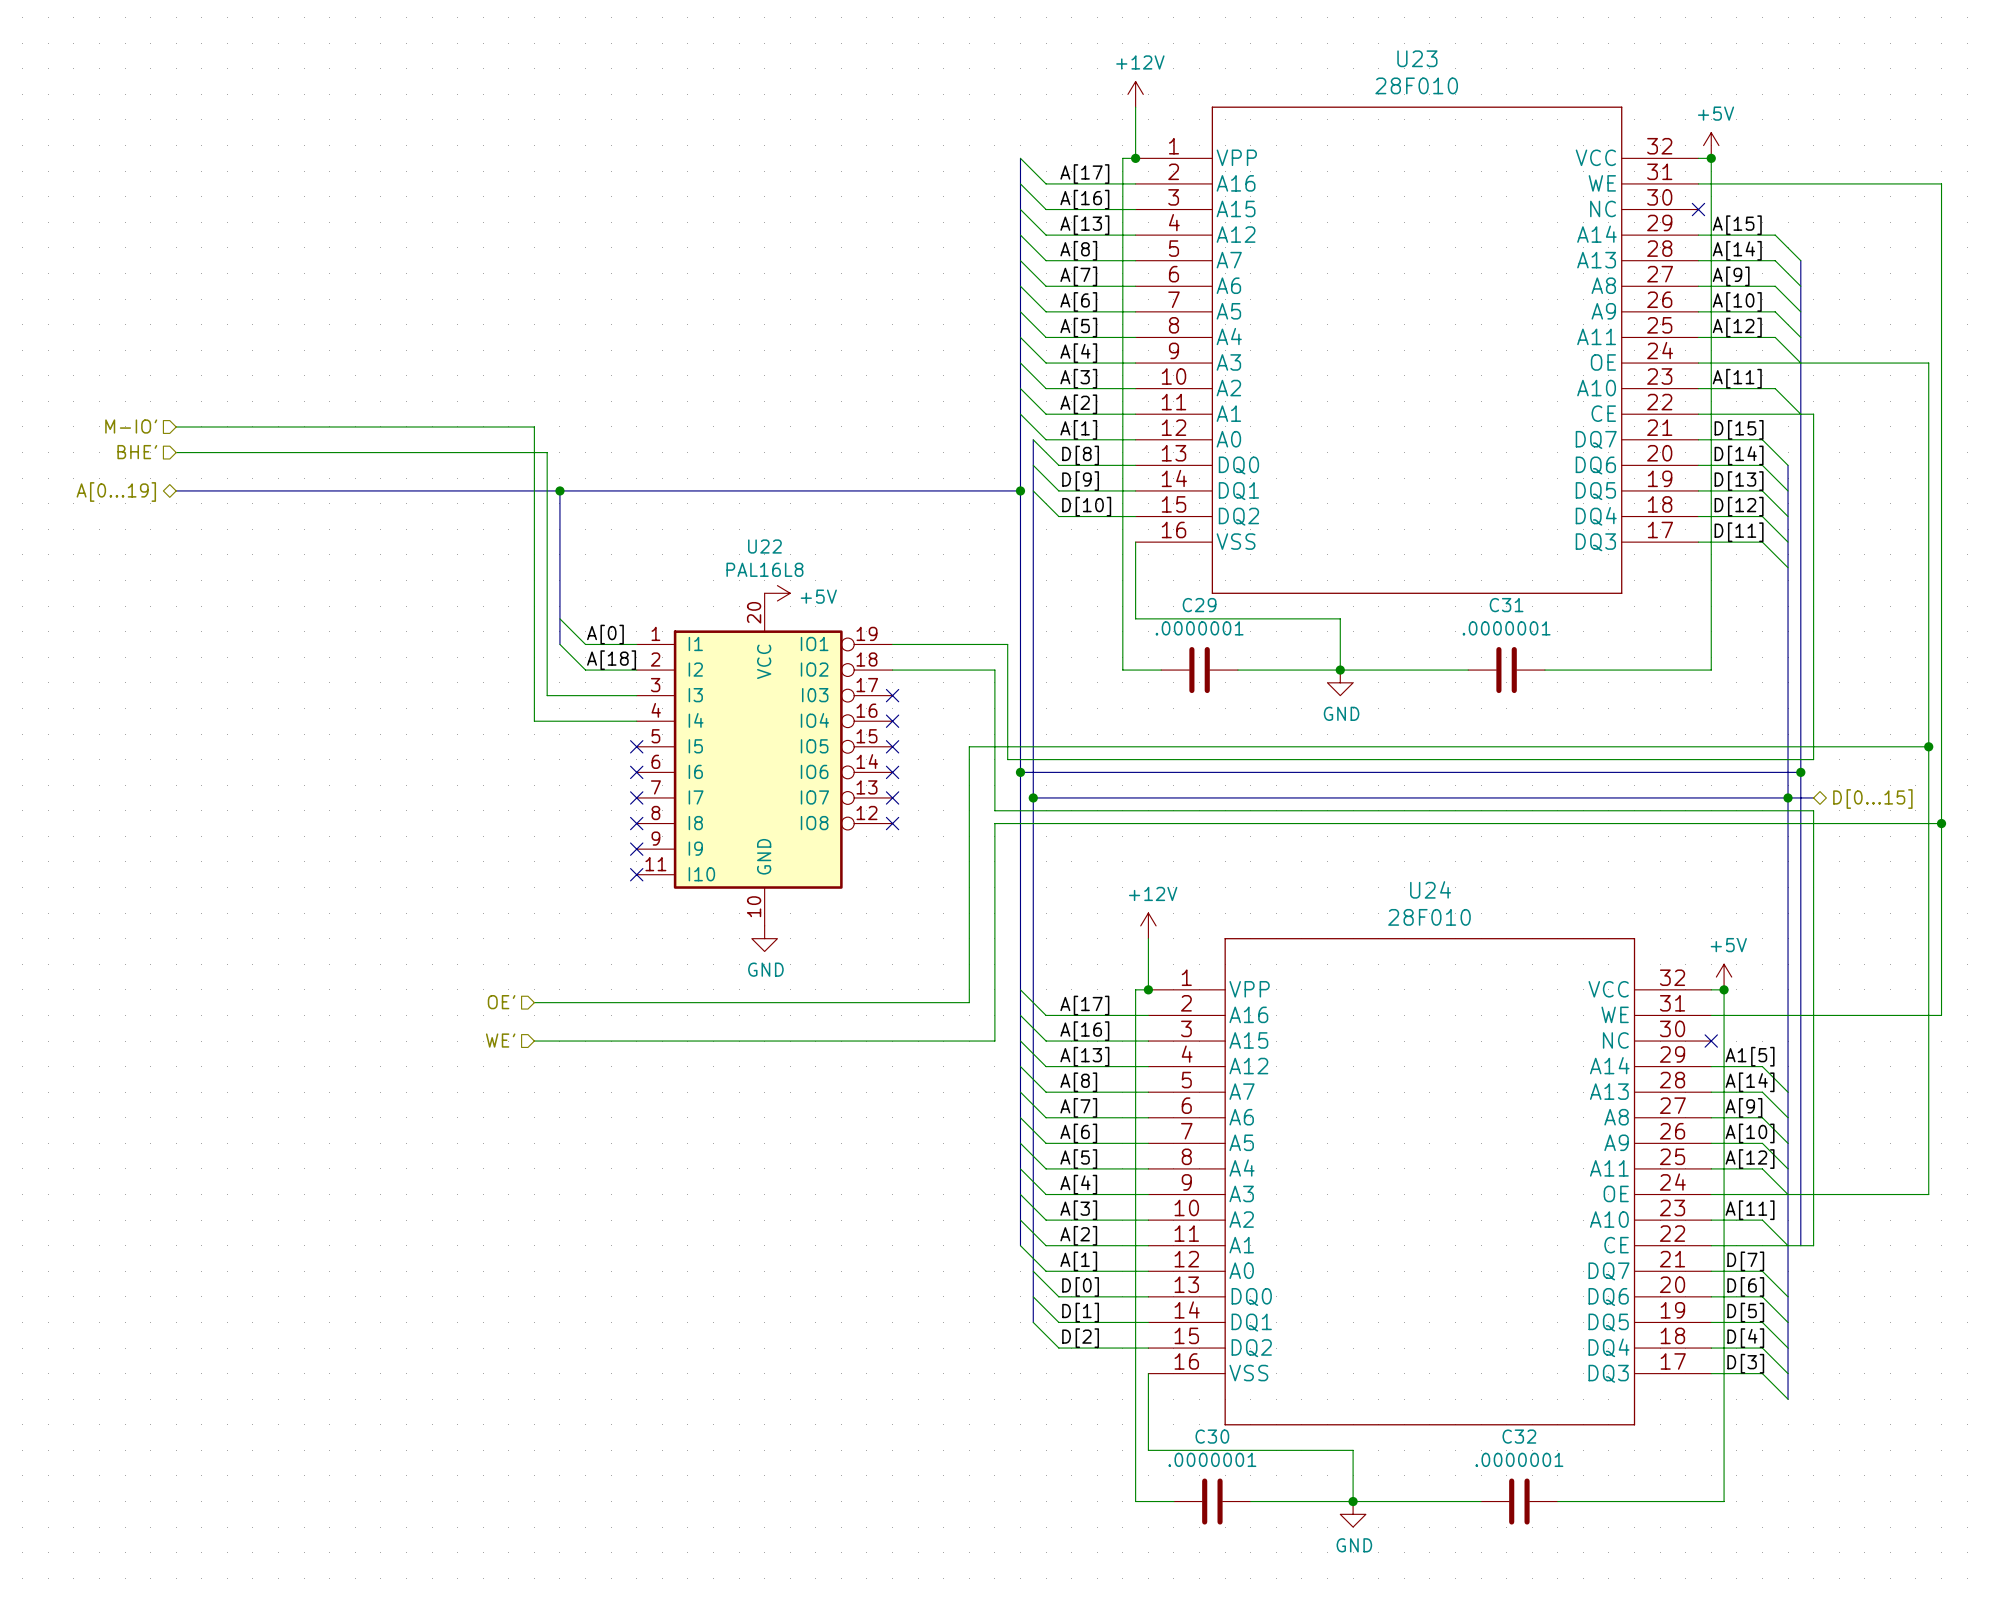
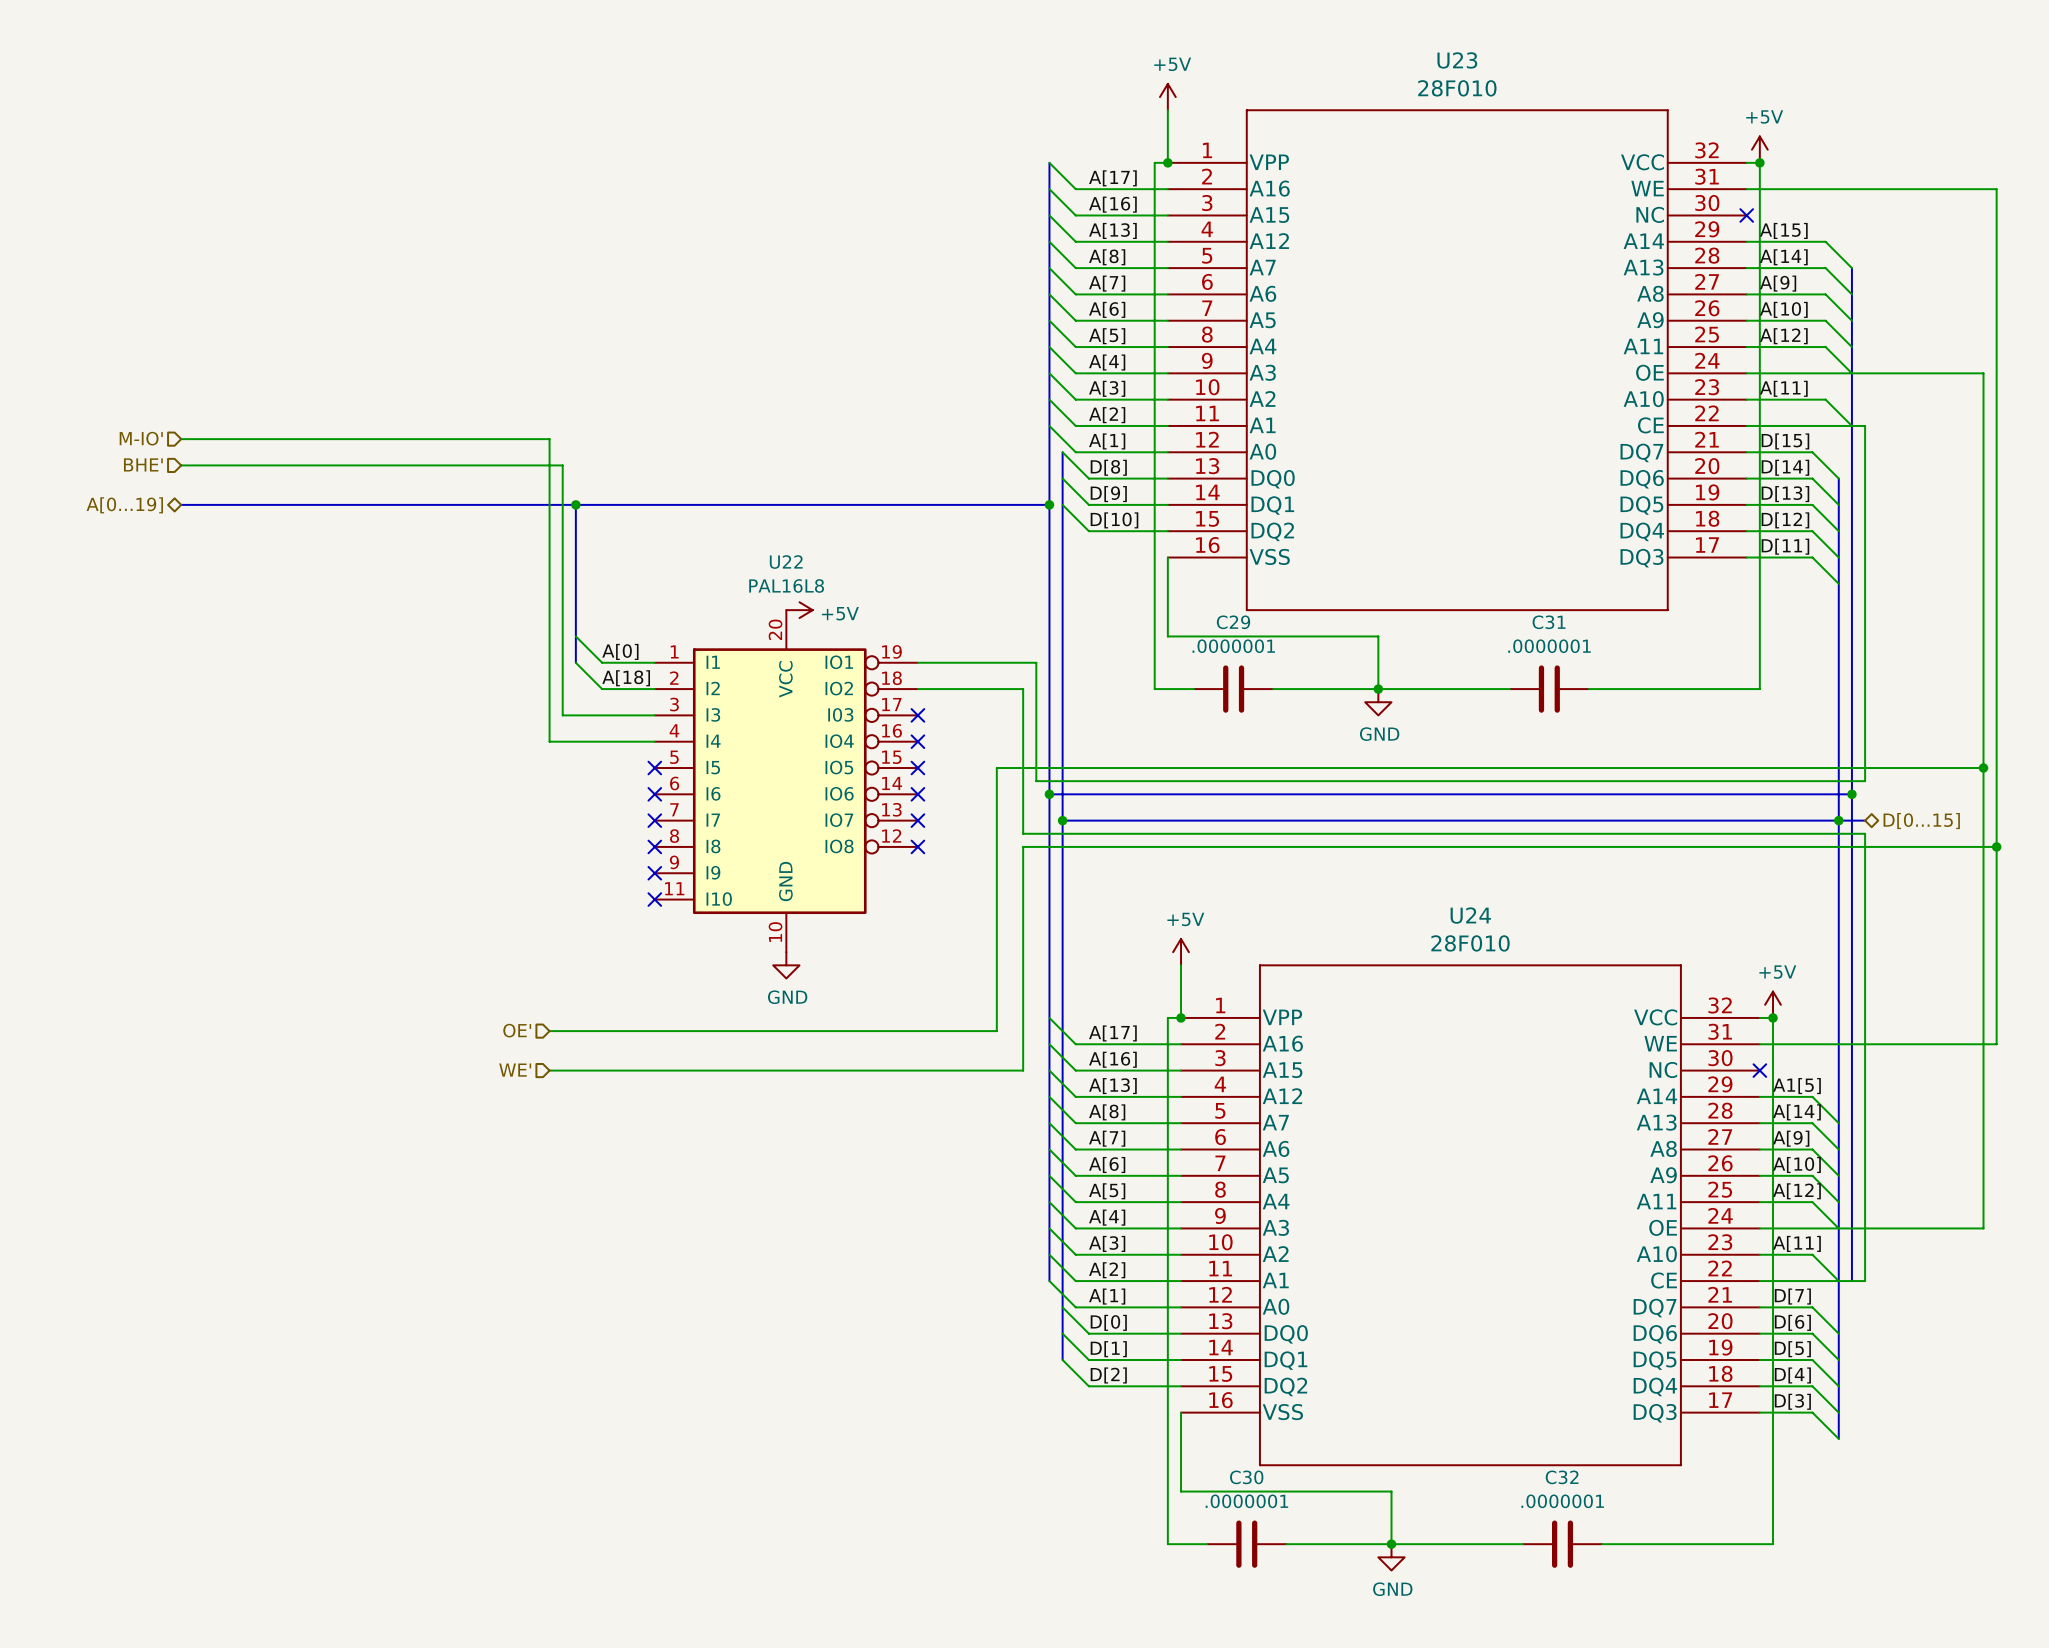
power symbol: +12V (1135, 94) -> +5V (1167, 97)
power symbol: +12V (1148, 925) -> +5V (1181, 952)

